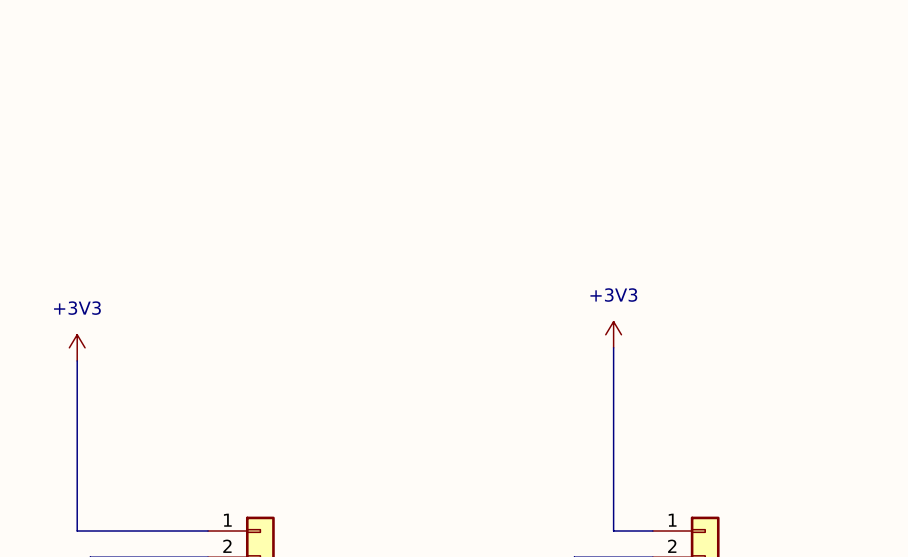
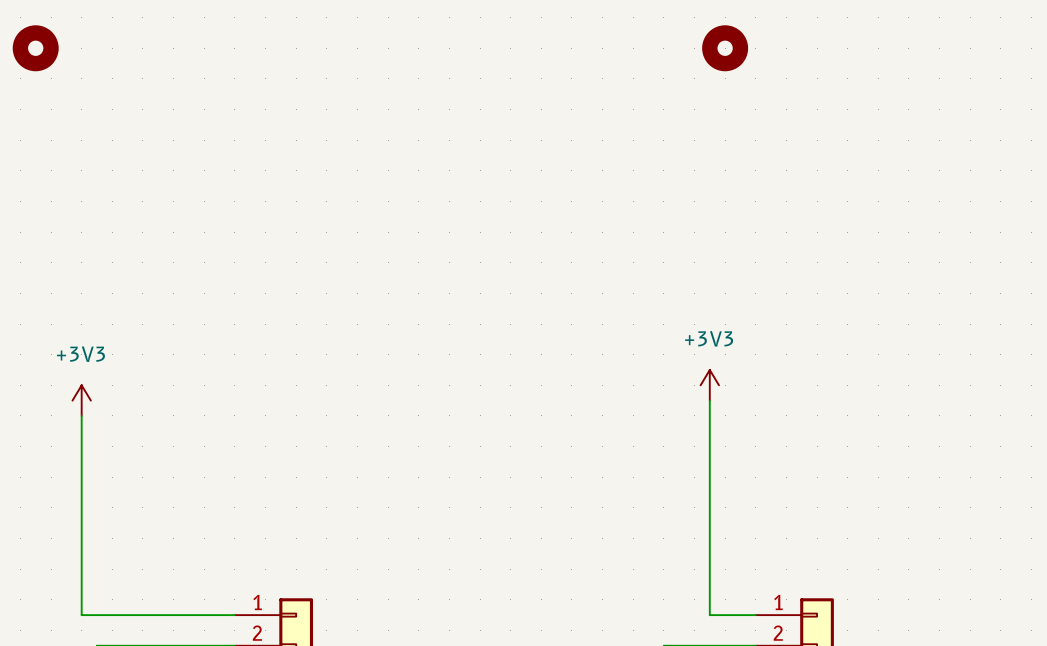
part: none -> (35, 48)
part: none -> (725, 48)

